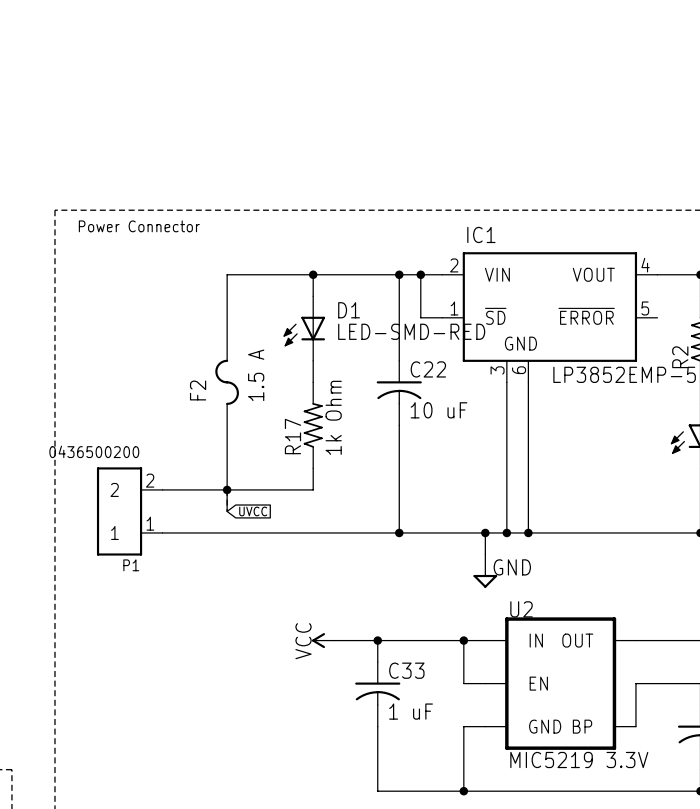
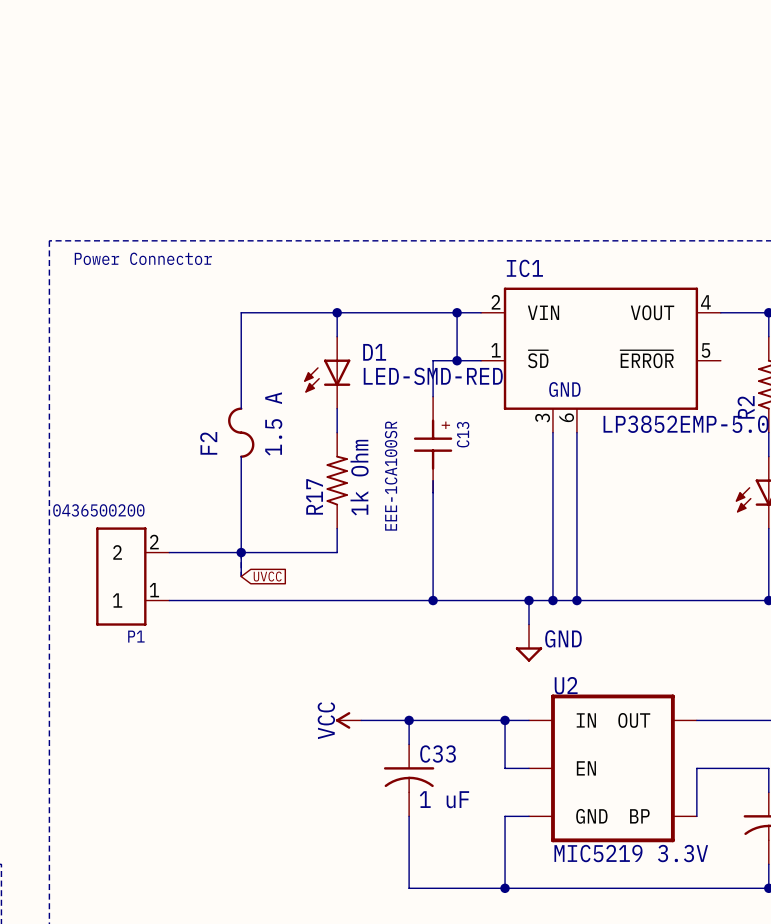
wire: (399, 274) (399, 317) -> (457, 360) (433, 360)
junction position: (399, 274) -> (457, 360)
C22: 10 uF (399, 393) -> none
C13: none -> EEE-1CA100SR (433, 444)

